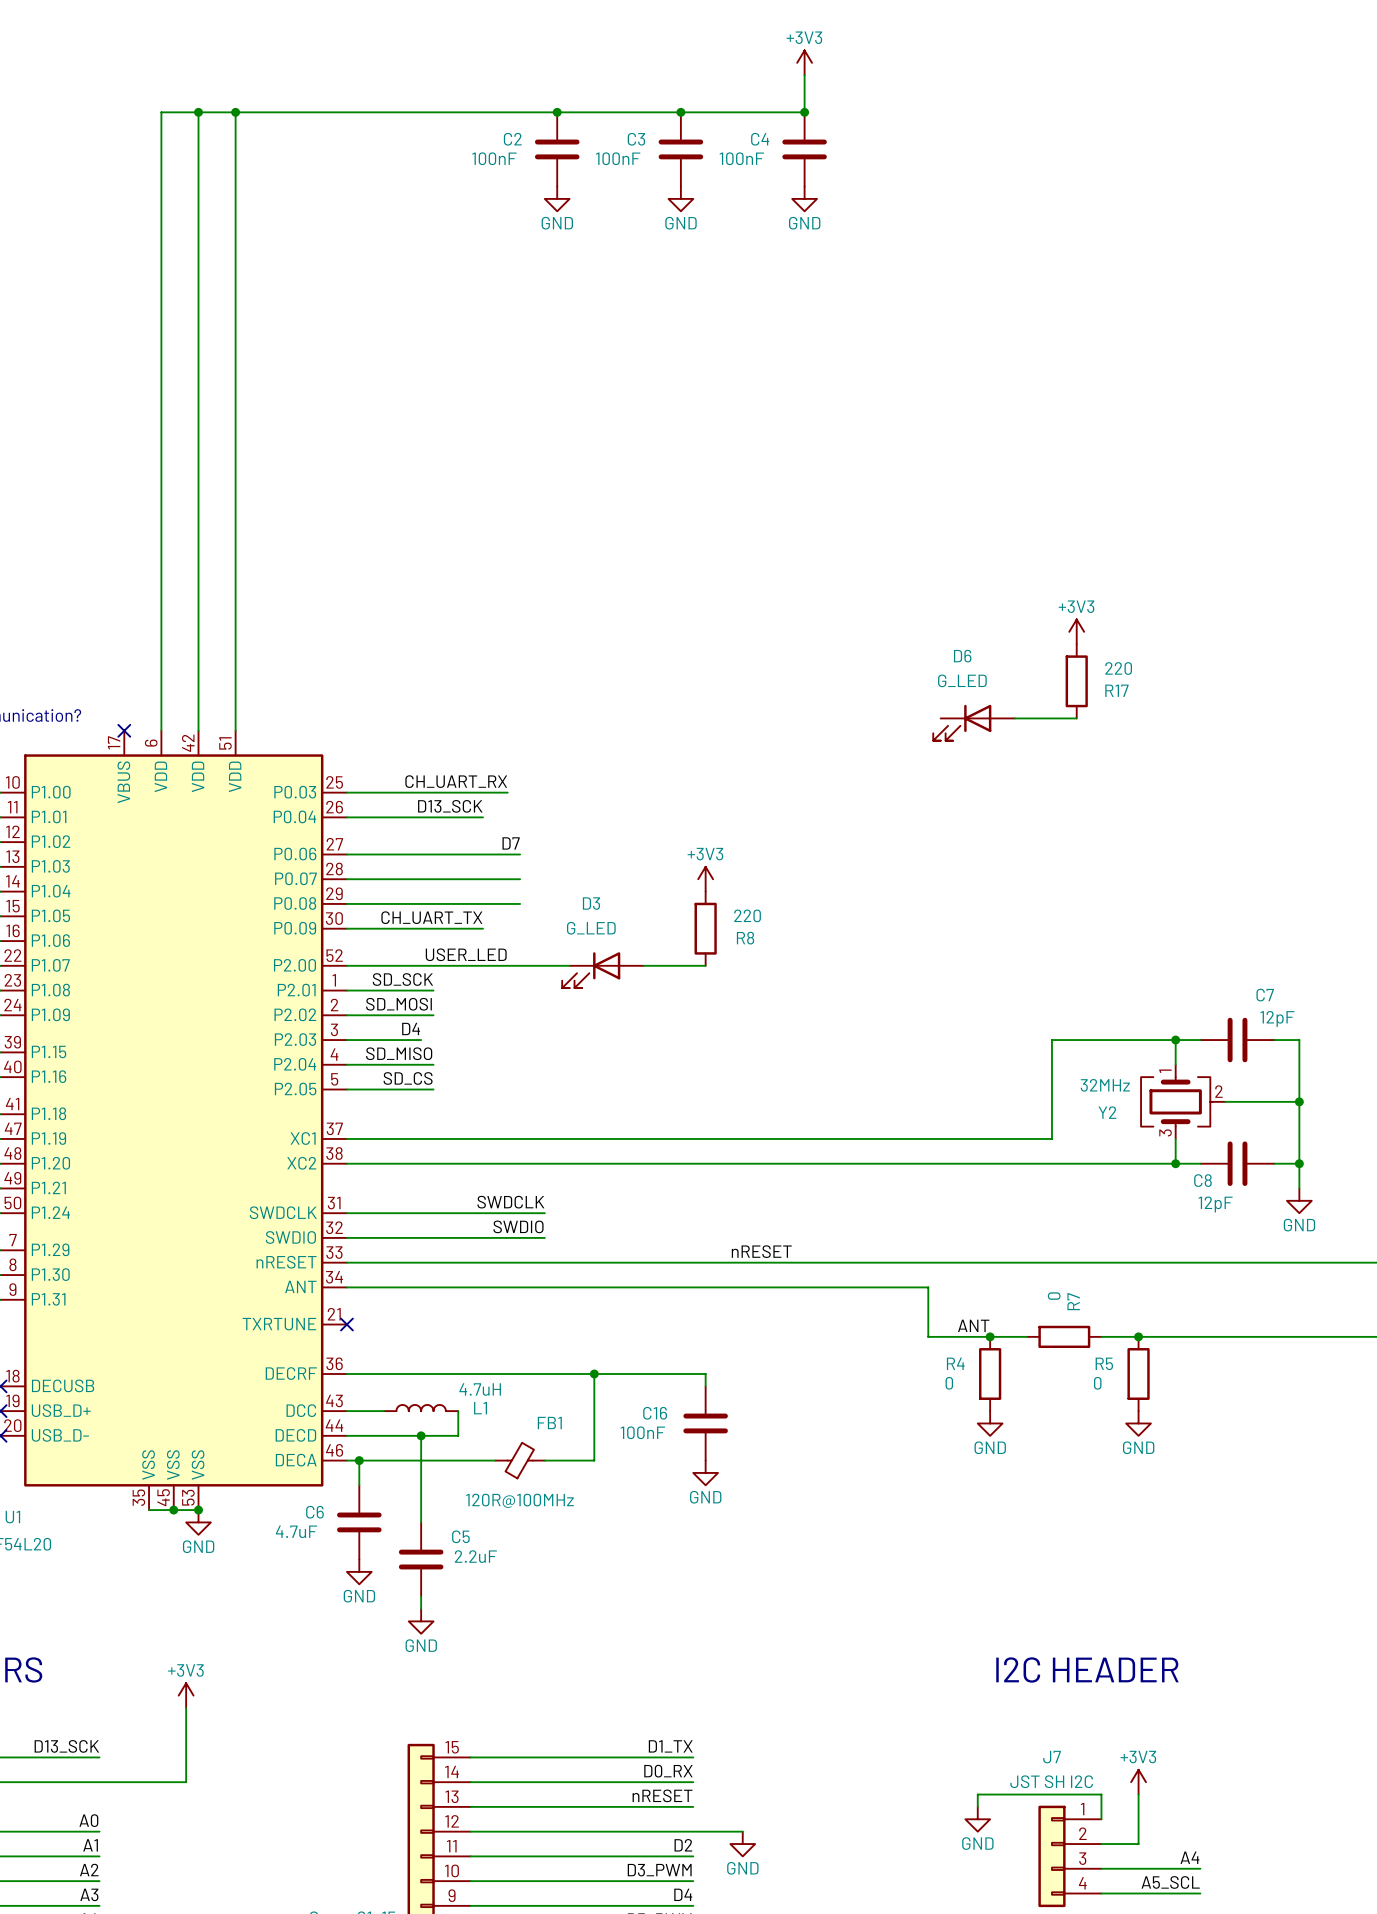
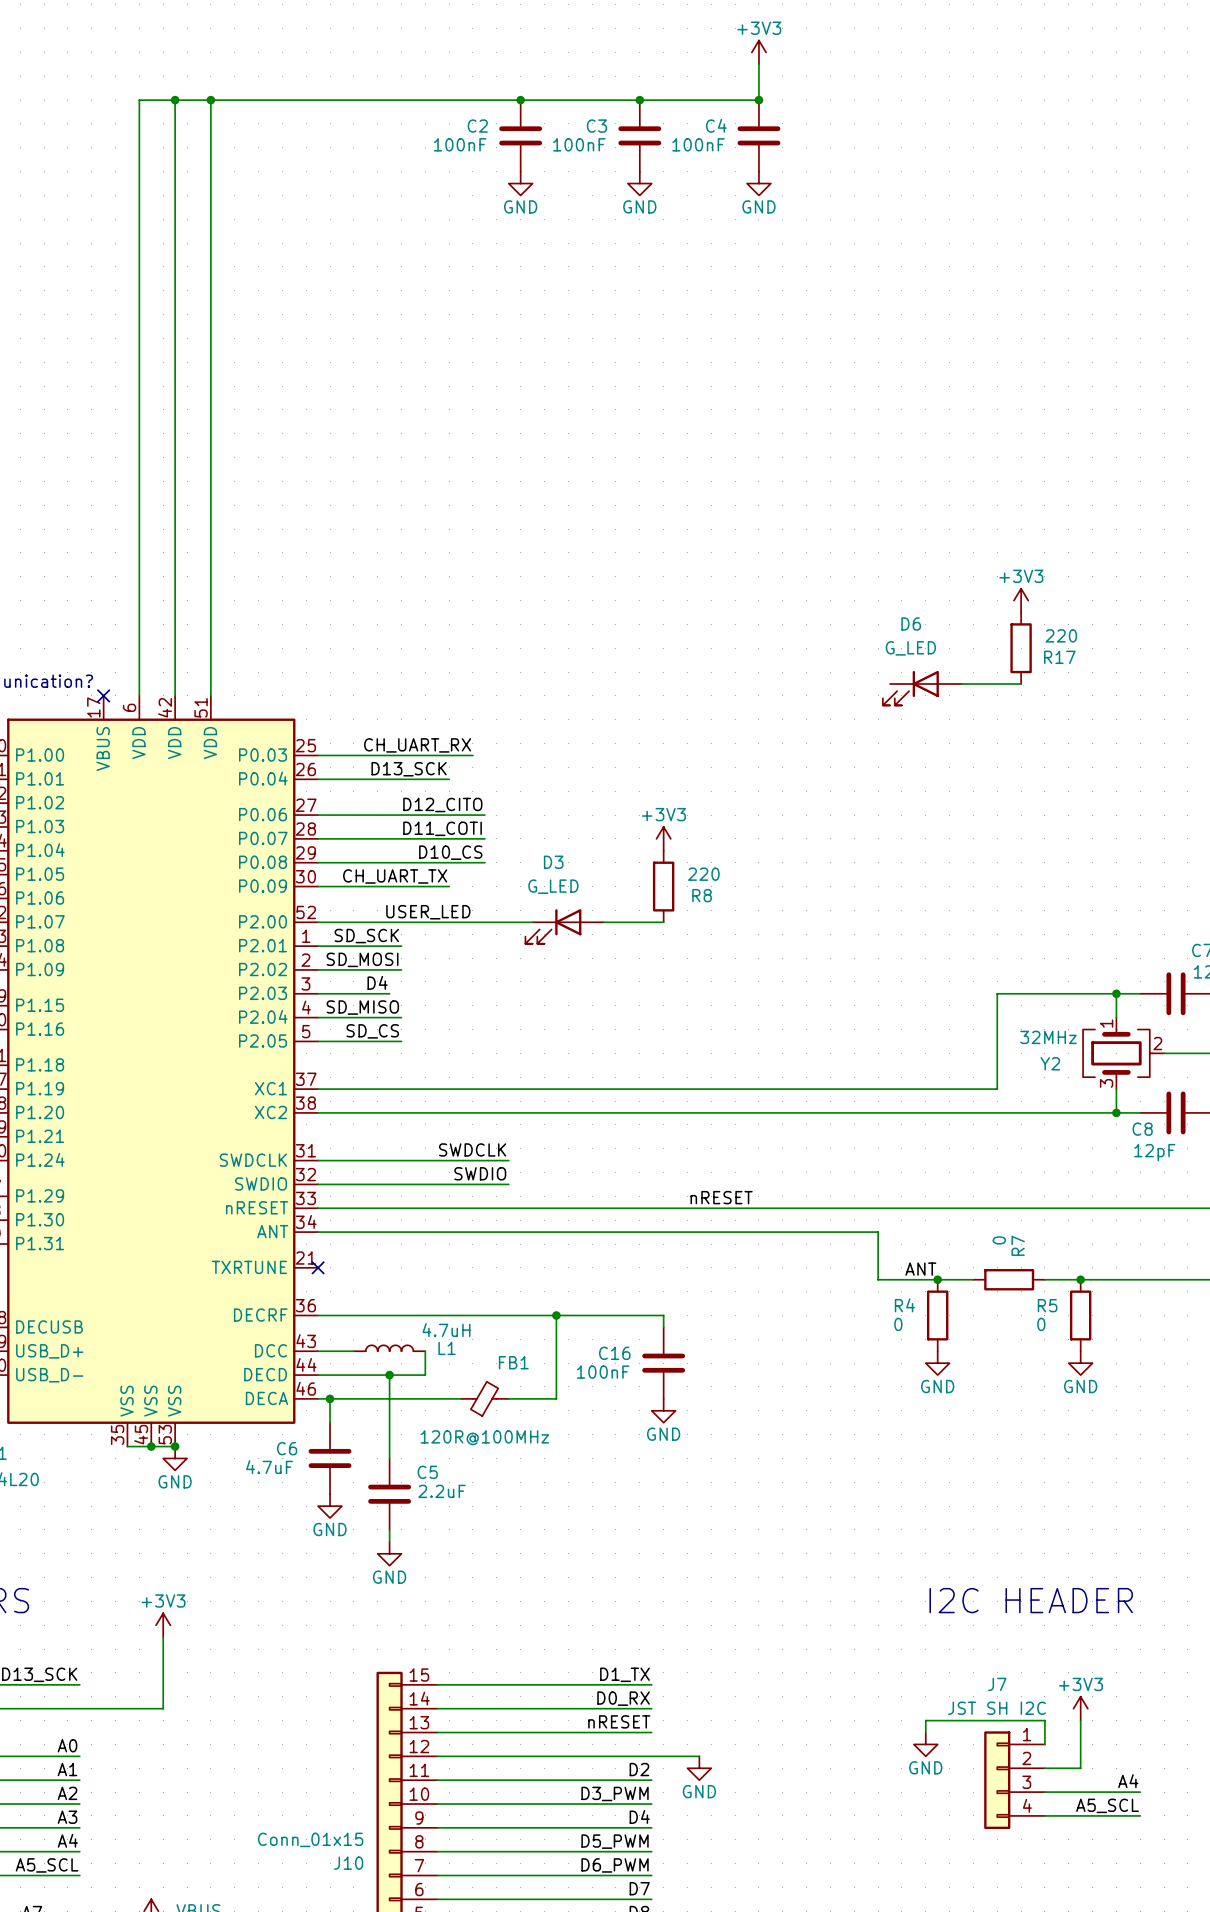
label: D7 (511, 843) -> D12_CITO (442, 804)
label: none -> D11_COTI (442, 828)
label: none -> D10_CS (450, 852)

